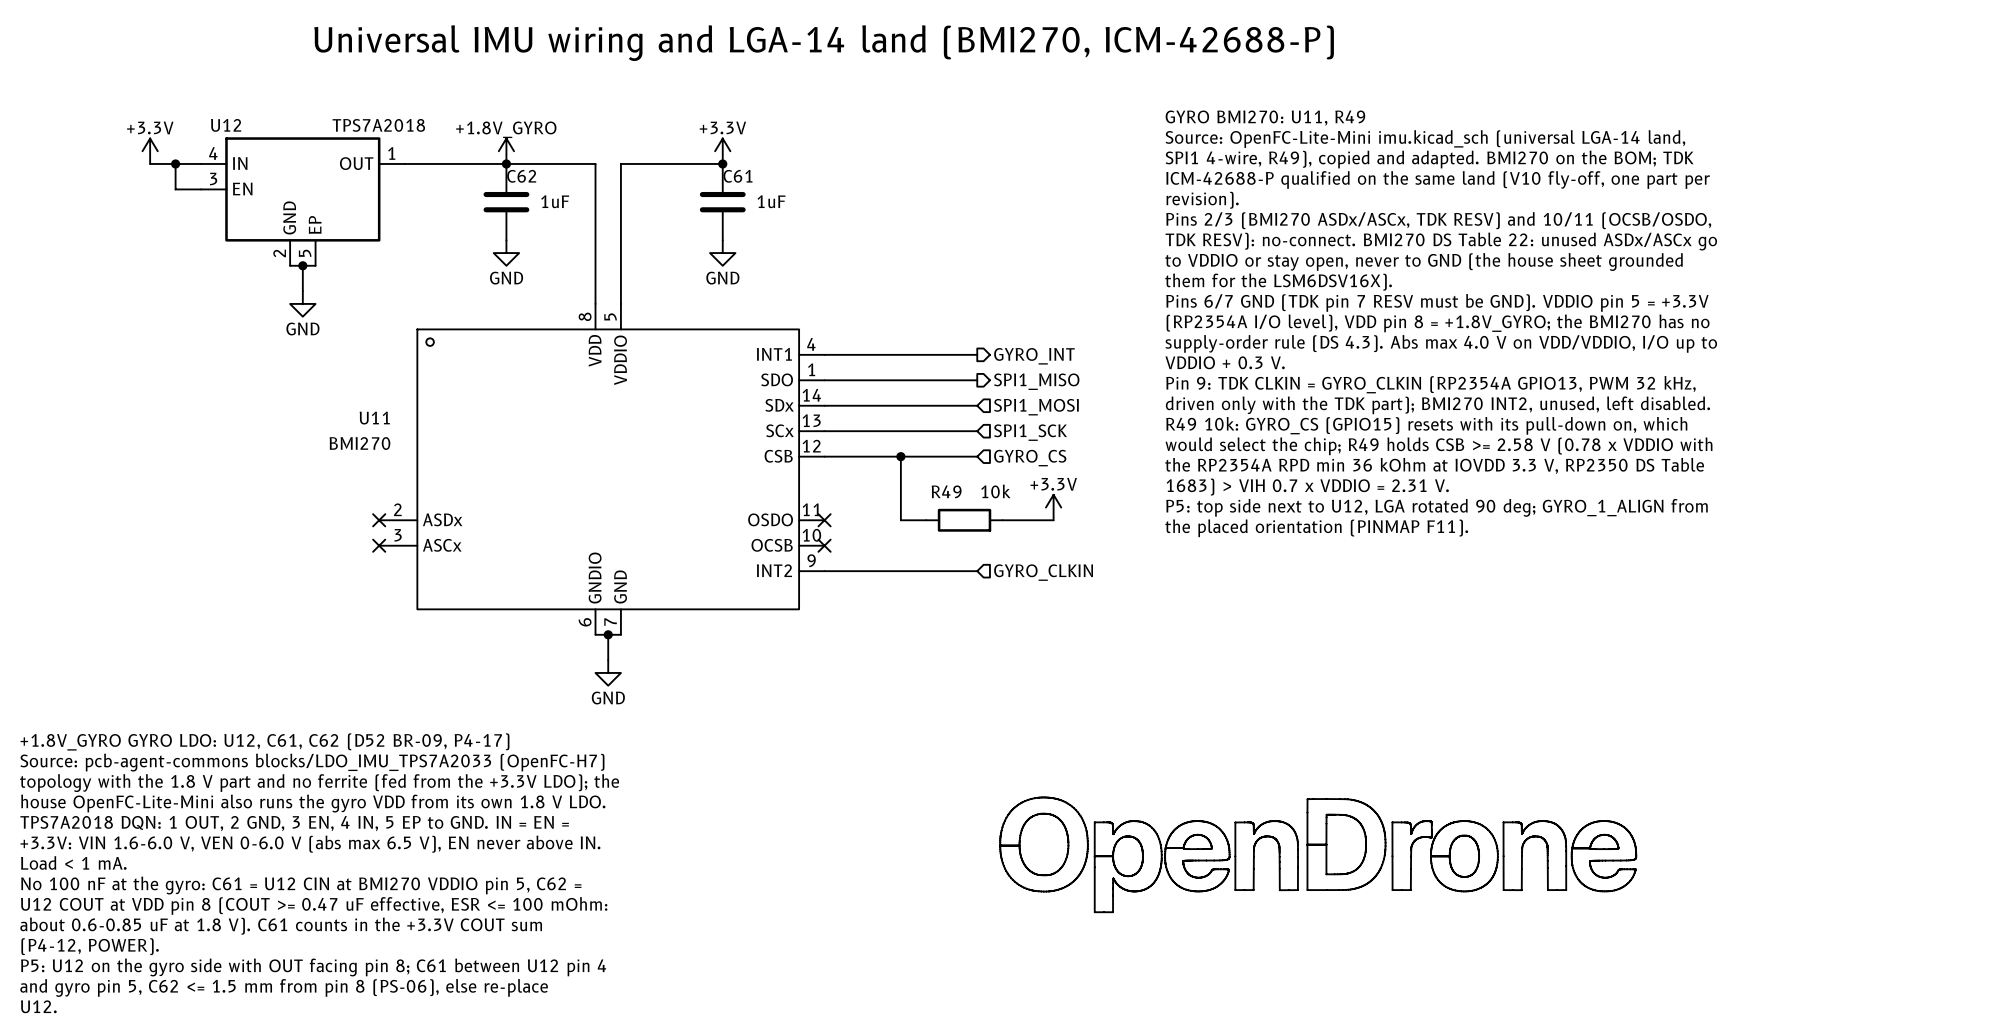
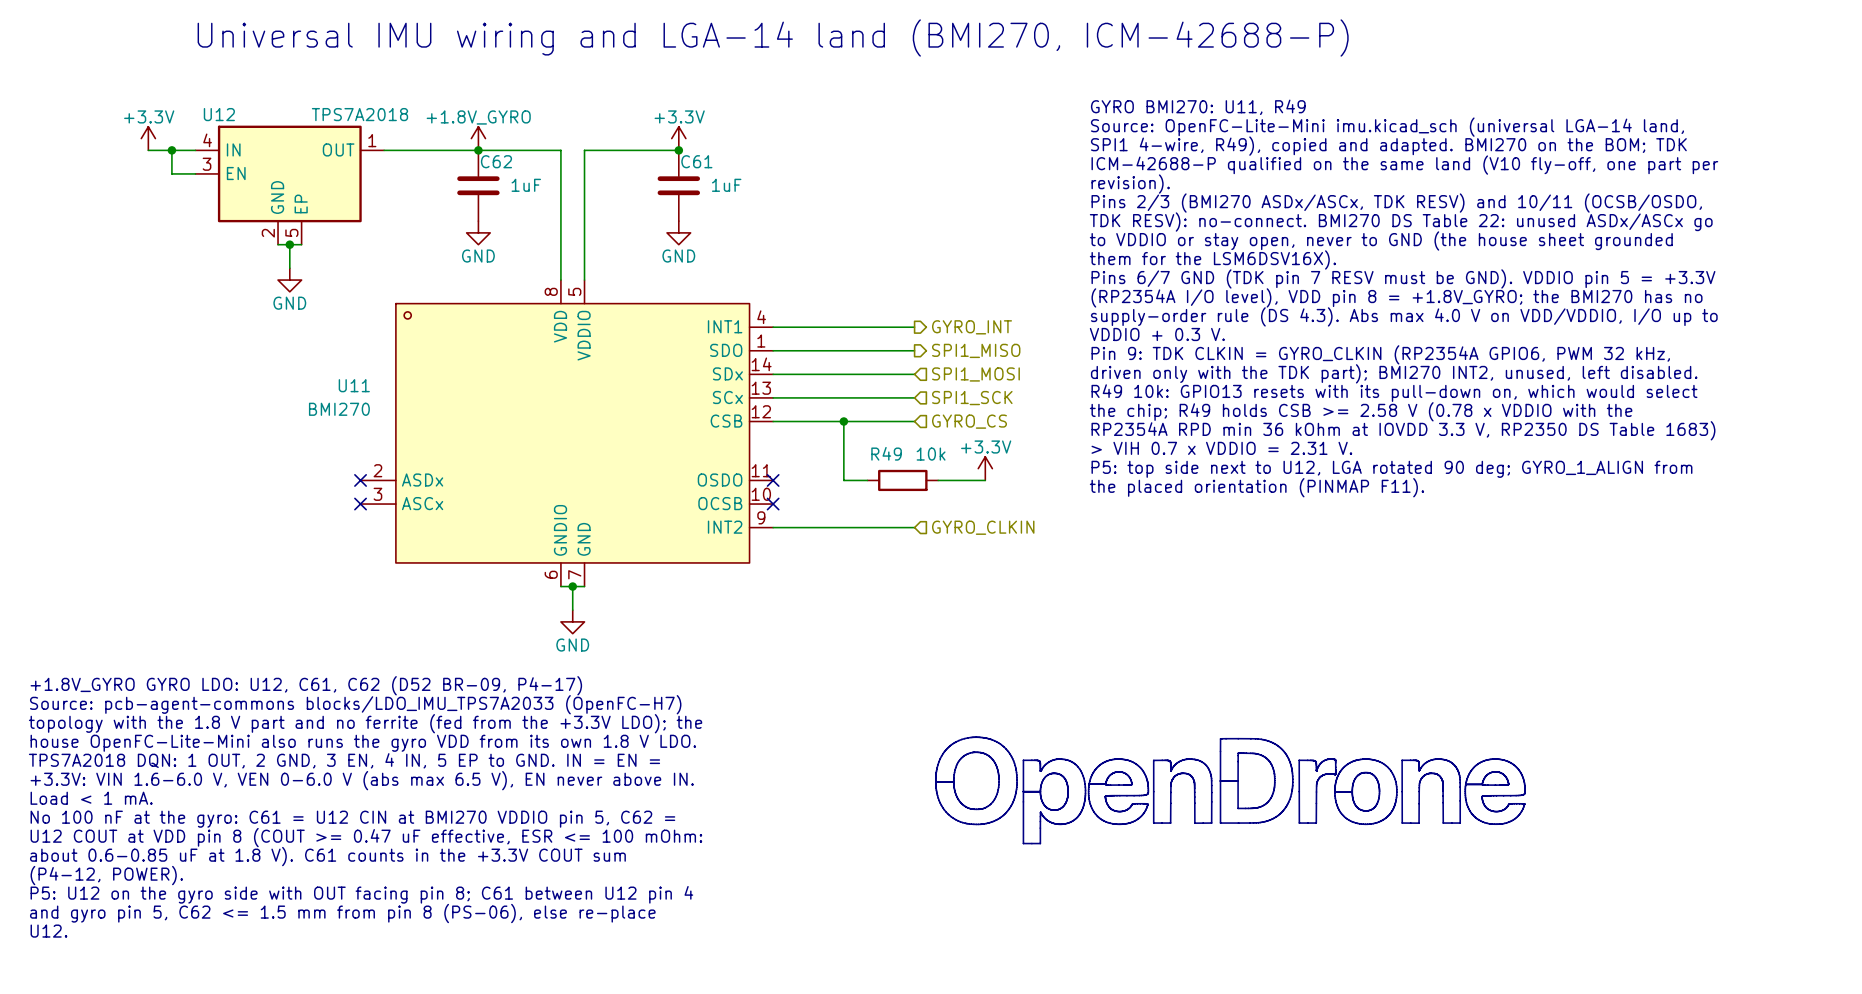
text: Pin 9: TDK CLKIN = GYRO_CLKIN (RP2354A GPIO13, PWM 32 kHz, (1430, 384) -> Pin 9: TDK CLKIN = GYRO_CLKIN (RP2354A GPIO6, PWM 32 kHz, (1380, 354)
text: R49 10k: GYRO_CS (GPIO15) resets with its pull-down on, which (1426, 425) -> R49 10k: GPIO13 resets with its pull-down on, which would select (1394, 393)
text: would select the chip; R49 holds CSB >= 2.58 V (0.78 x VDDIO with (1438, 446) -> the chip; R49 holds CSB >= 2.58 V (0.78 x VDDIO with the (1361, 411)
text: the RP2354A RPD min 36 kOhm at IOVDD 3.3 V, RP2350 DS Table (1434, 465) -> RP2354A RPD min 36 kOhm at IOVDD 3.3 V, RP2350 DS Table 1683) (1403, 430)
text: 1683) > VIH 0.7 x VDDIO = 2.31 V. (1307, 487) -> > VIH 0.7 x VDDIO = 2.31 V. (1221, 448)

